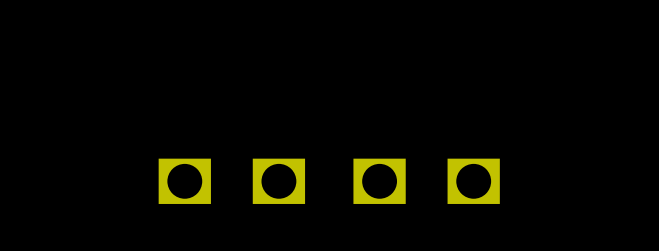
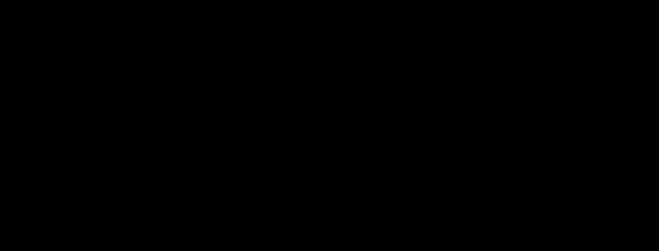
part: (231, 181) -> none
part: (426, 181) -> none

